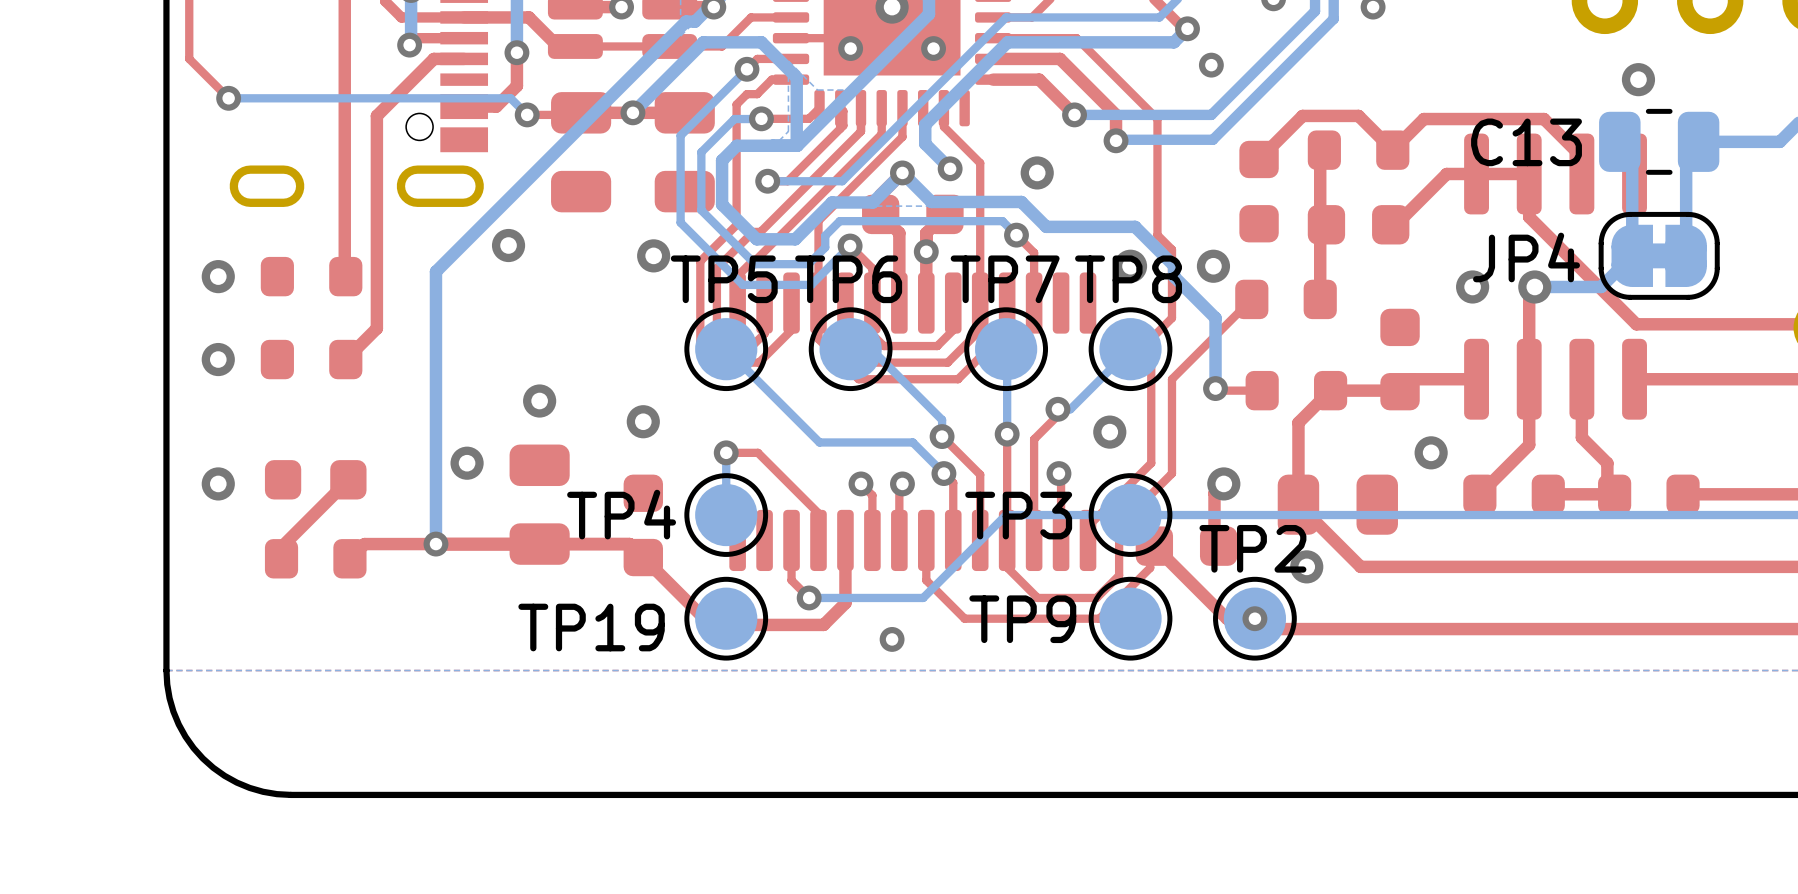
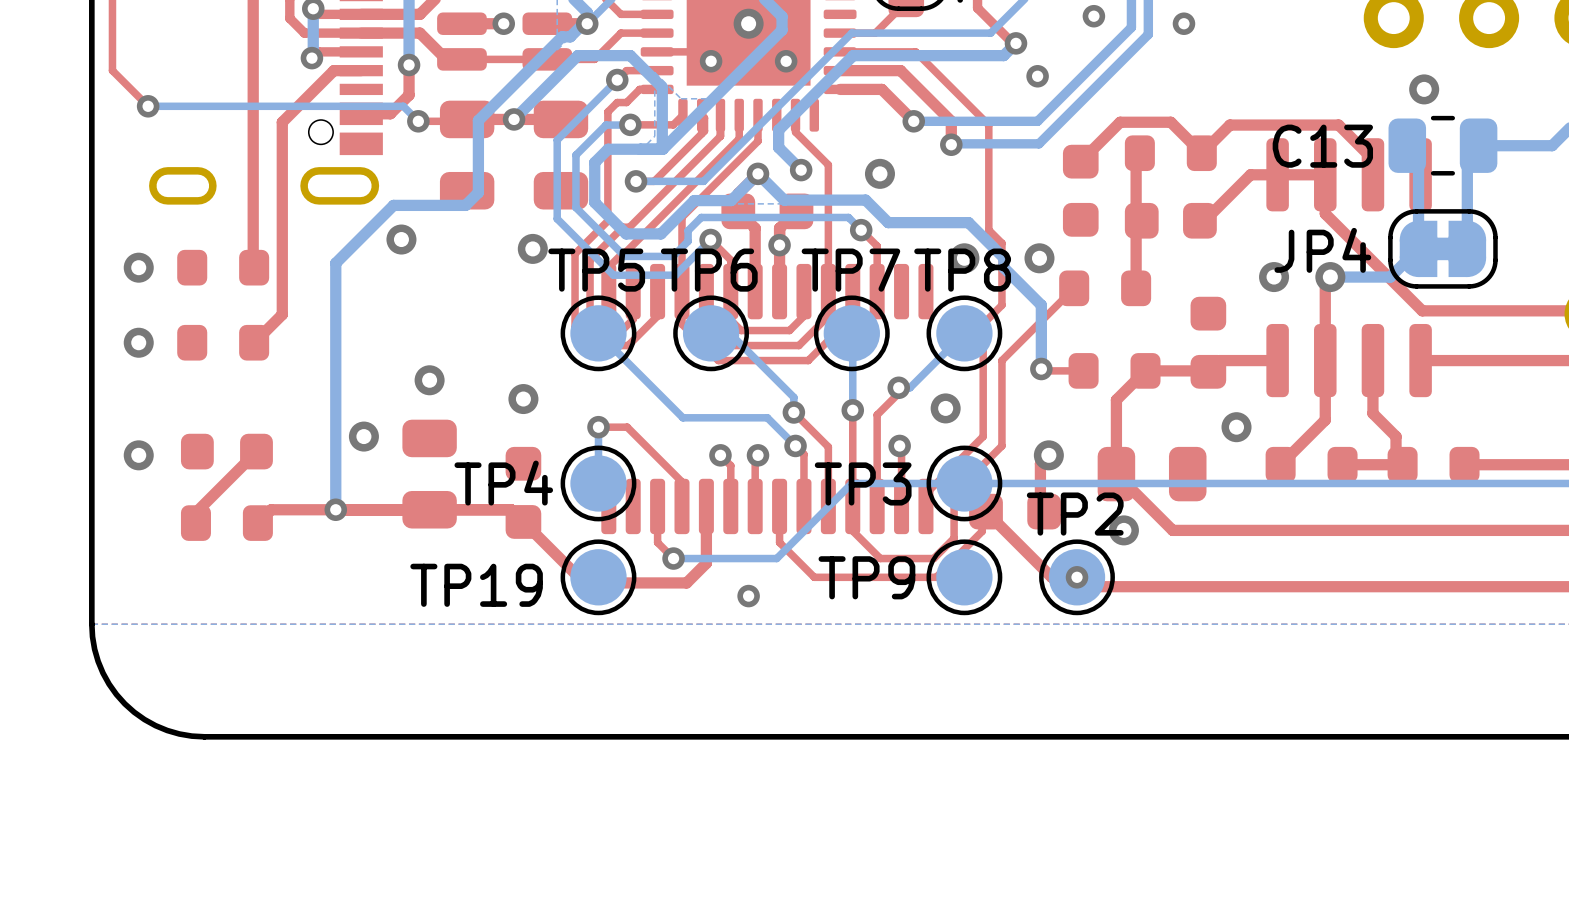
bottom track: (593, 114) (499, 207) -> (478, 120) (478, 192) (465, 205) (393, 205)

